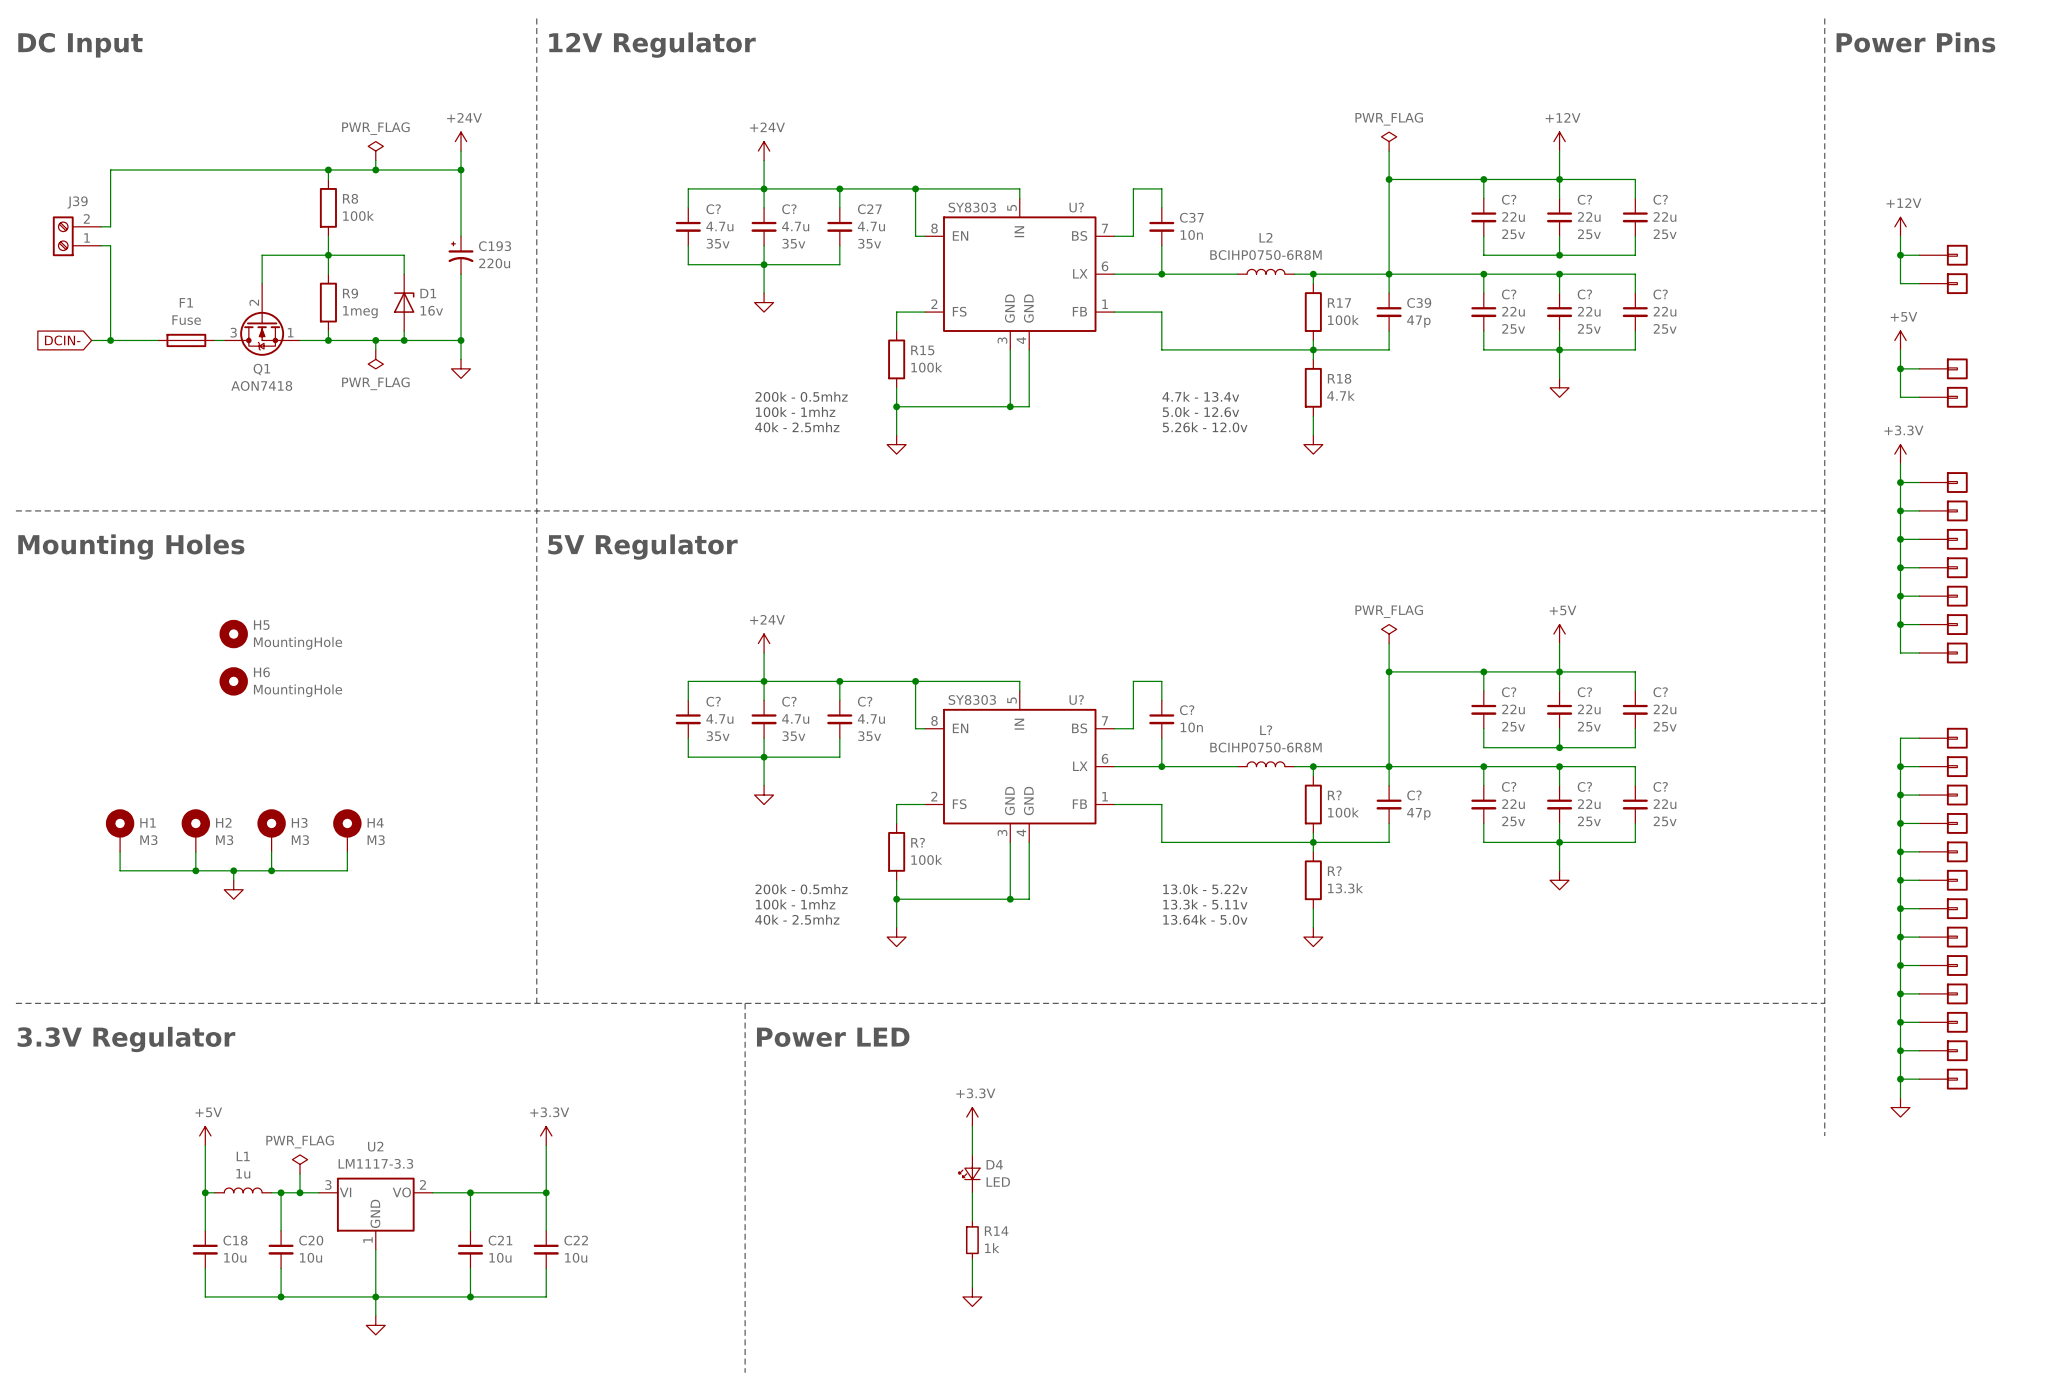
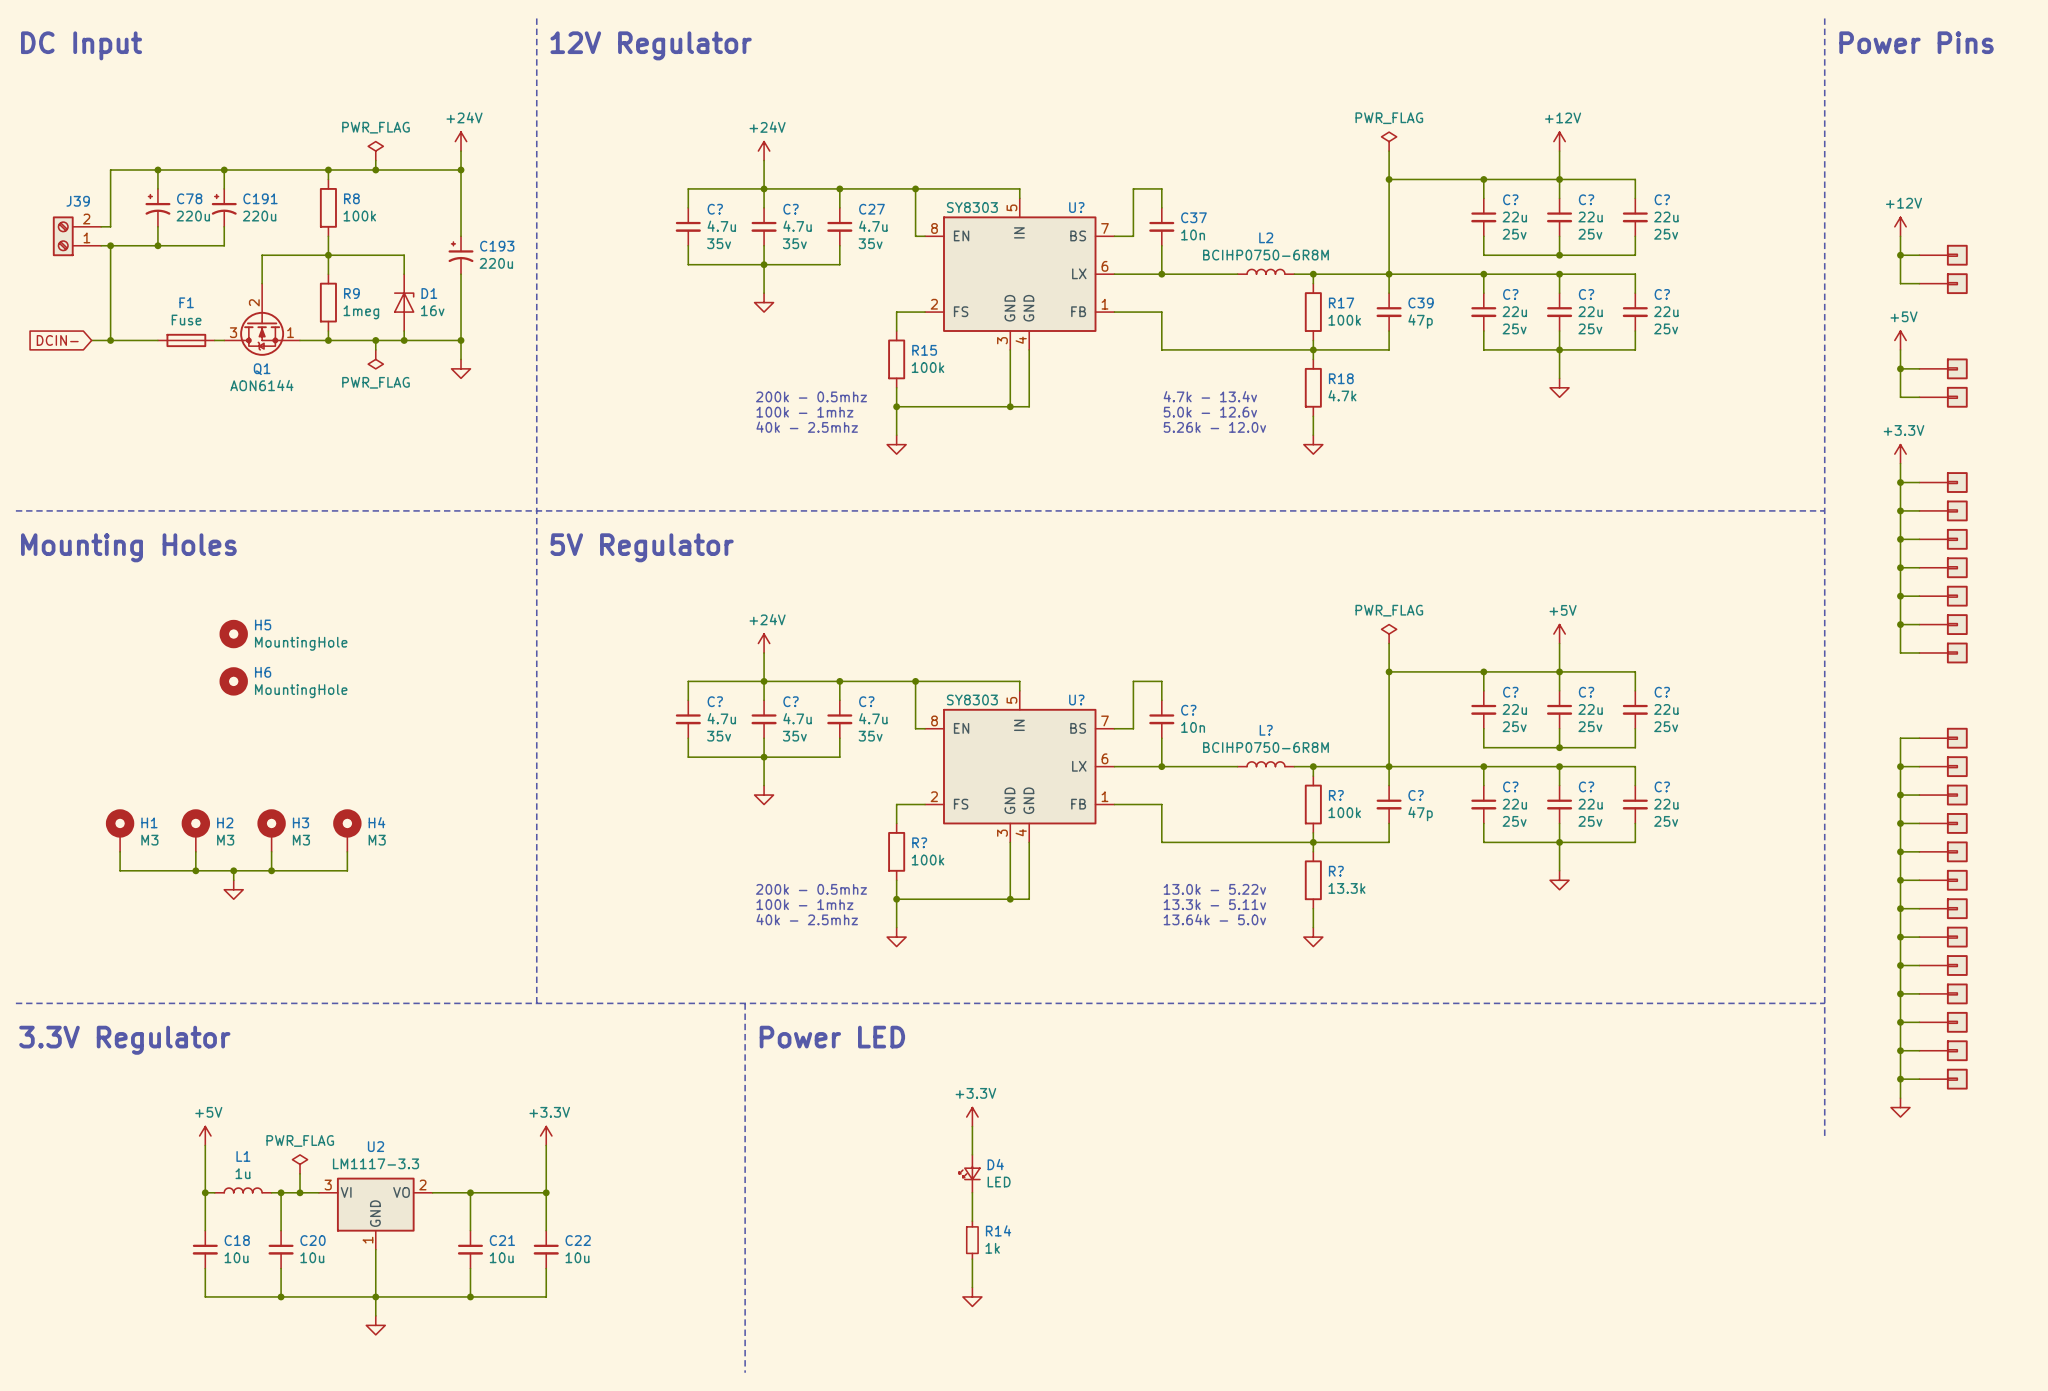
wire: none -> (157, 170) (157, 188)
junction: none -> (157, 170)
wire: none -> (224, 170) (224, 188)
junction: none -> (224, 170)
C78: none -> 220u (157, 207)
C191: none -> 220u (224, 207)
wire: none -> (157, 226) (157, 245)
wire: none -> (224, 226) (224, 245) (110, 245)
junction: none -> (110, 245)
junction: none -> (157, 245)
Q1 value: AON7418 (261, 385) -> AON6144 (261, 385)

